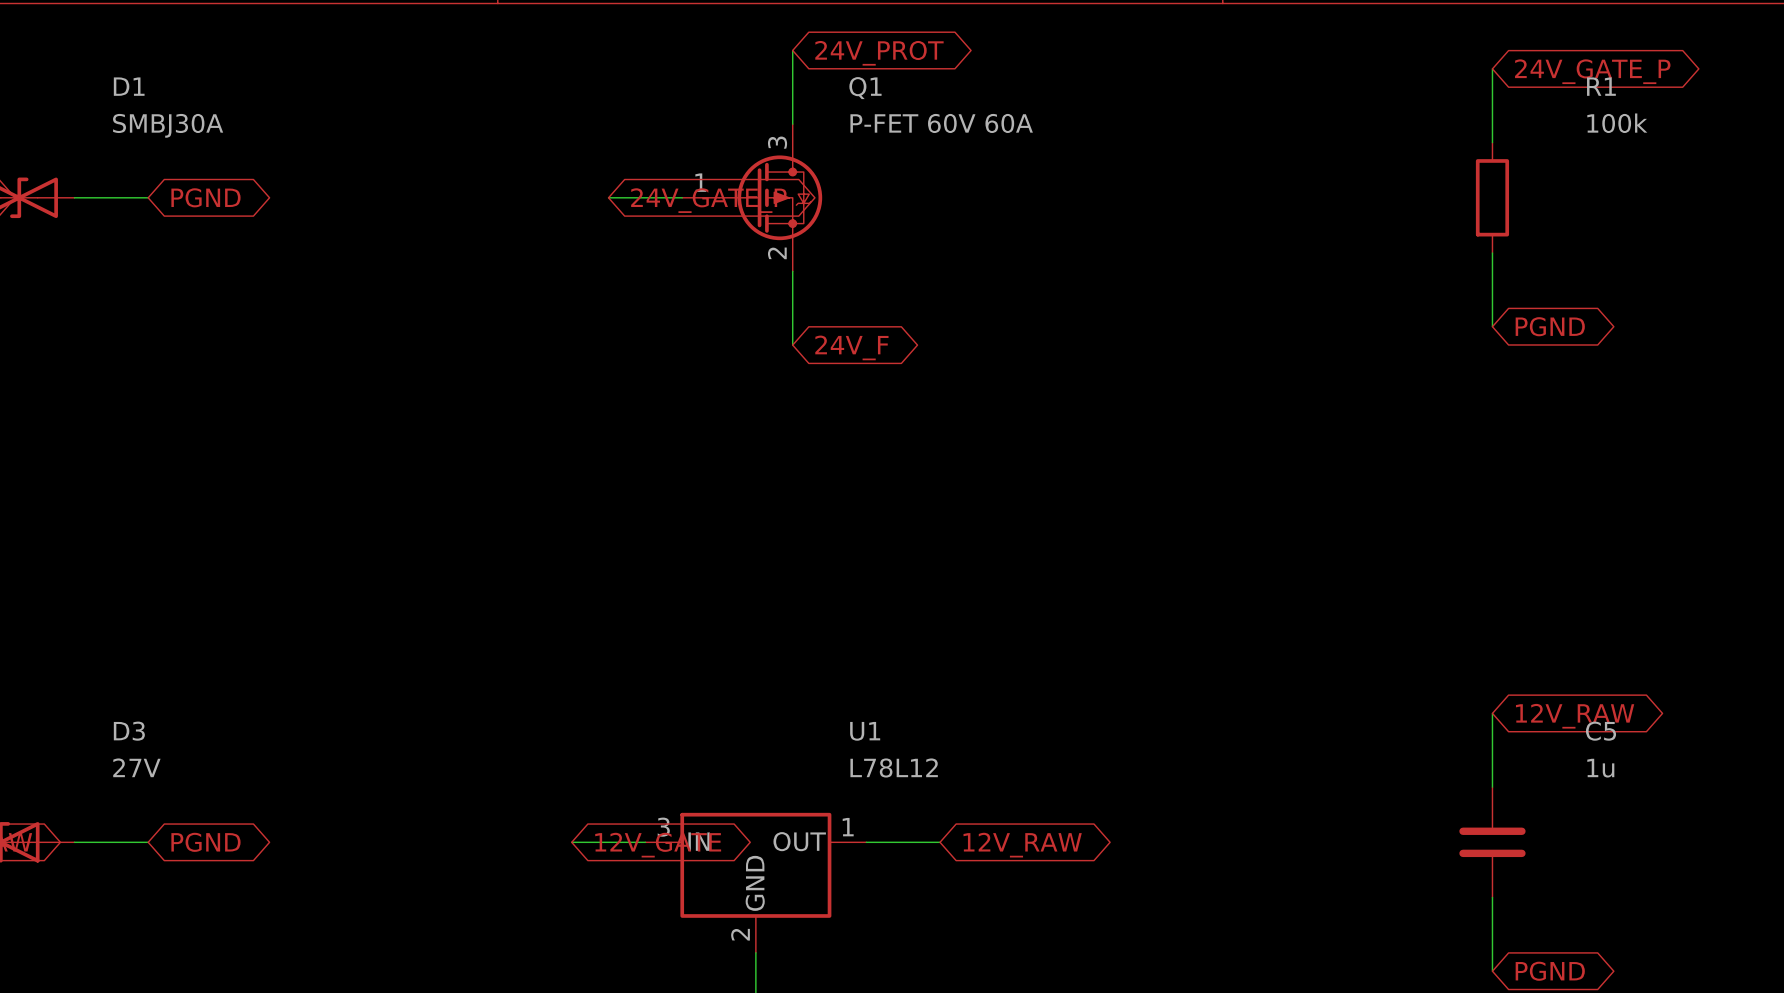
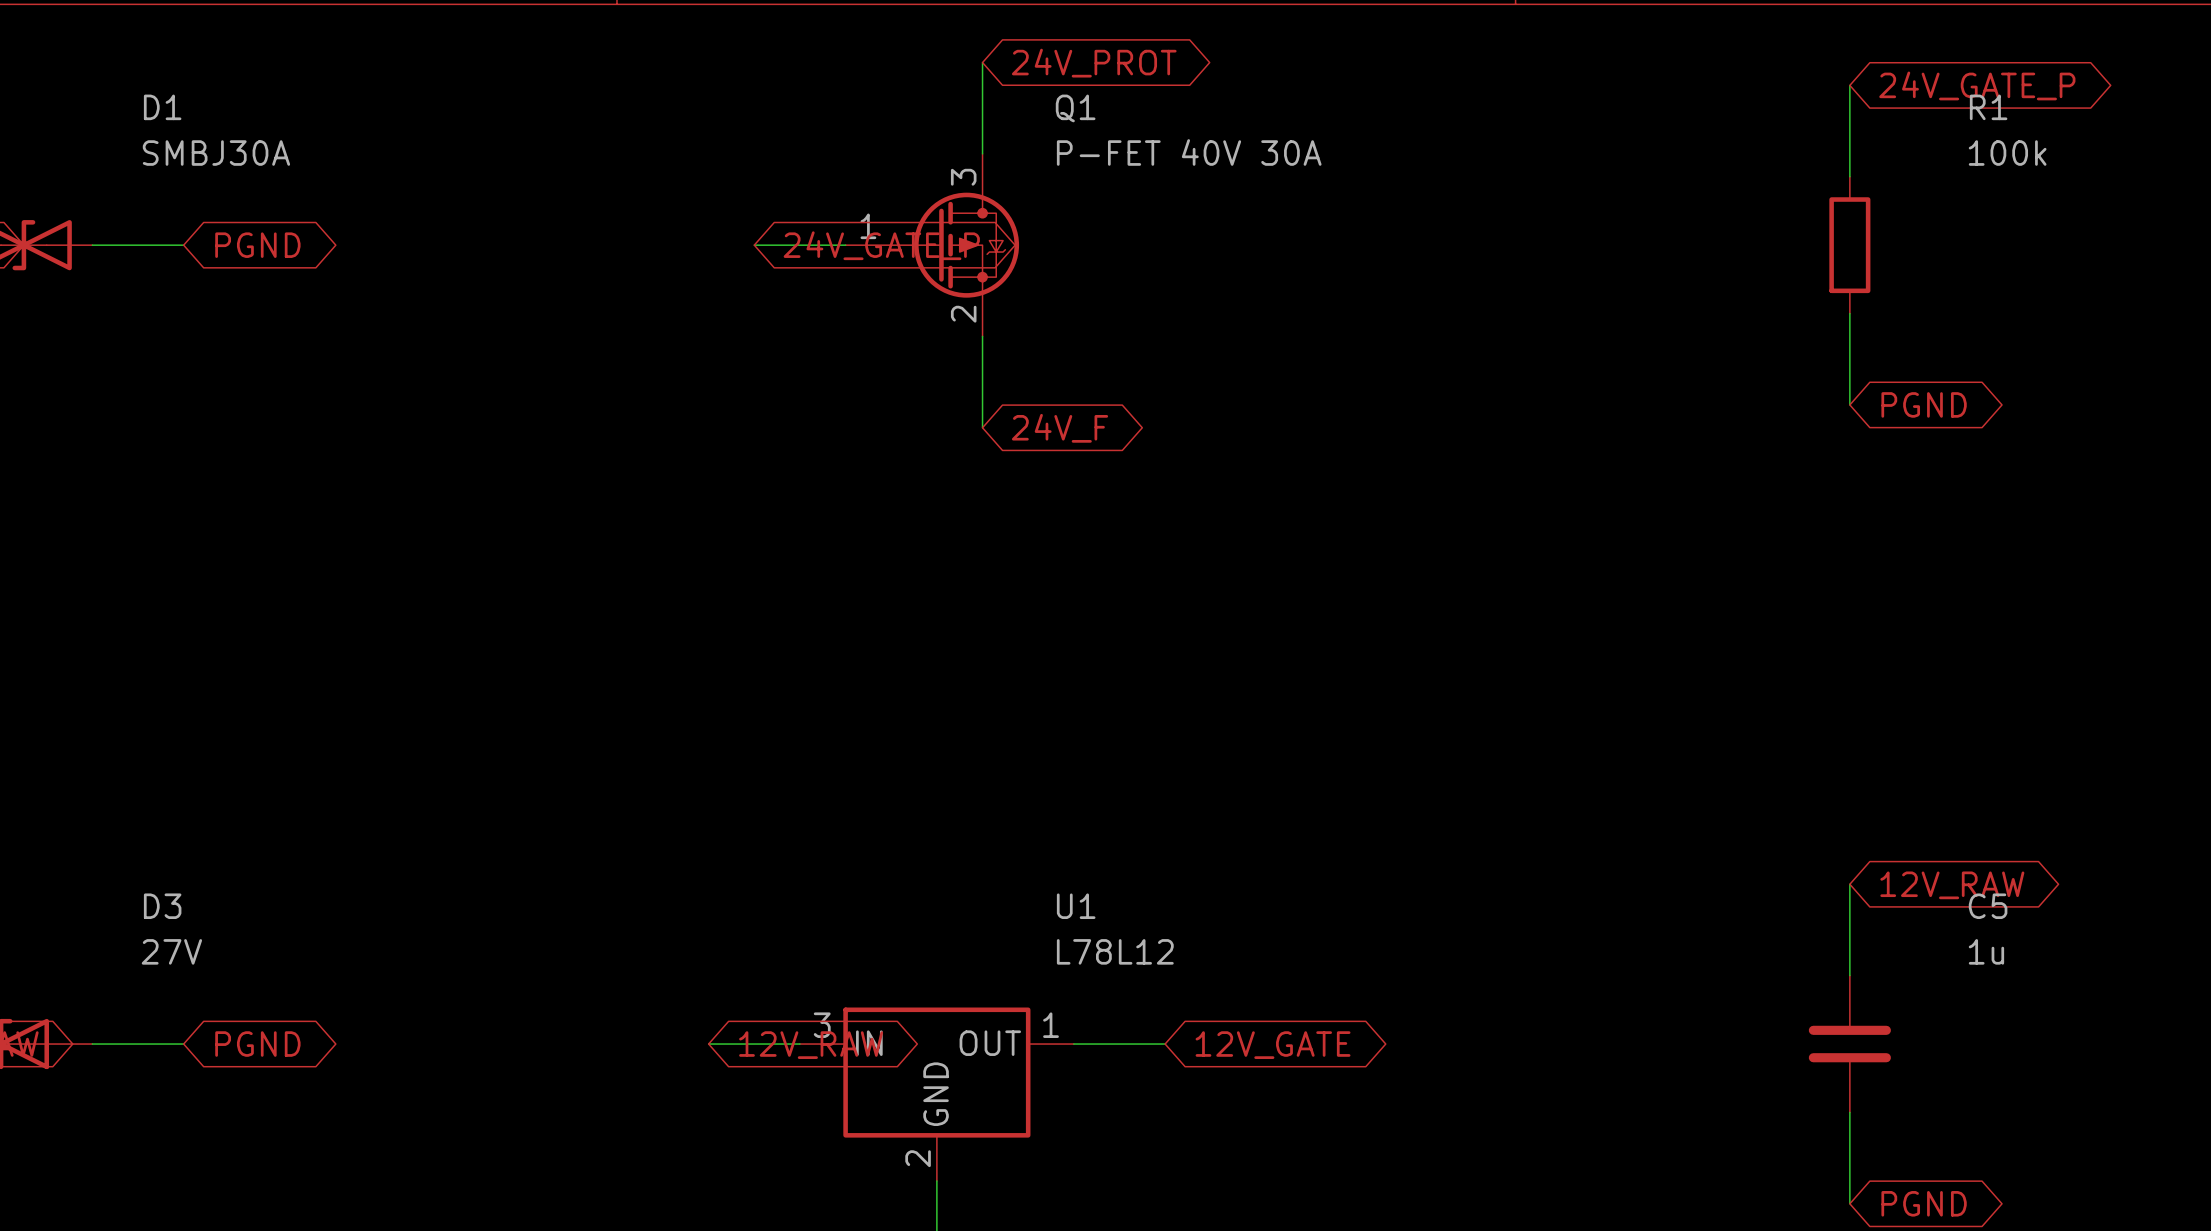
Q1 value: P-FET 60V 60A (941, 123) -> P-FET 40V 30A (1189, 152)
global label: 12V_GATE (658, 845) -> 12V_RAW (811, 1045)
global label: 12V_RAW (1022, 845) -> 12V_GATE (1273, 1045)

